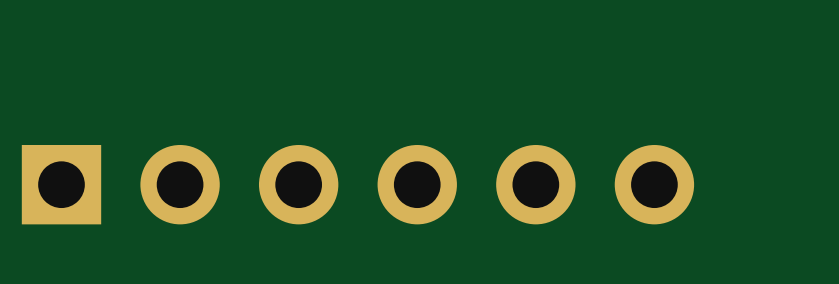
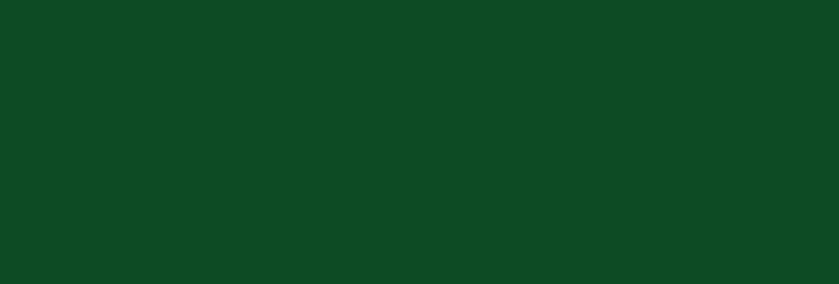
part: (357, 184) -> none

